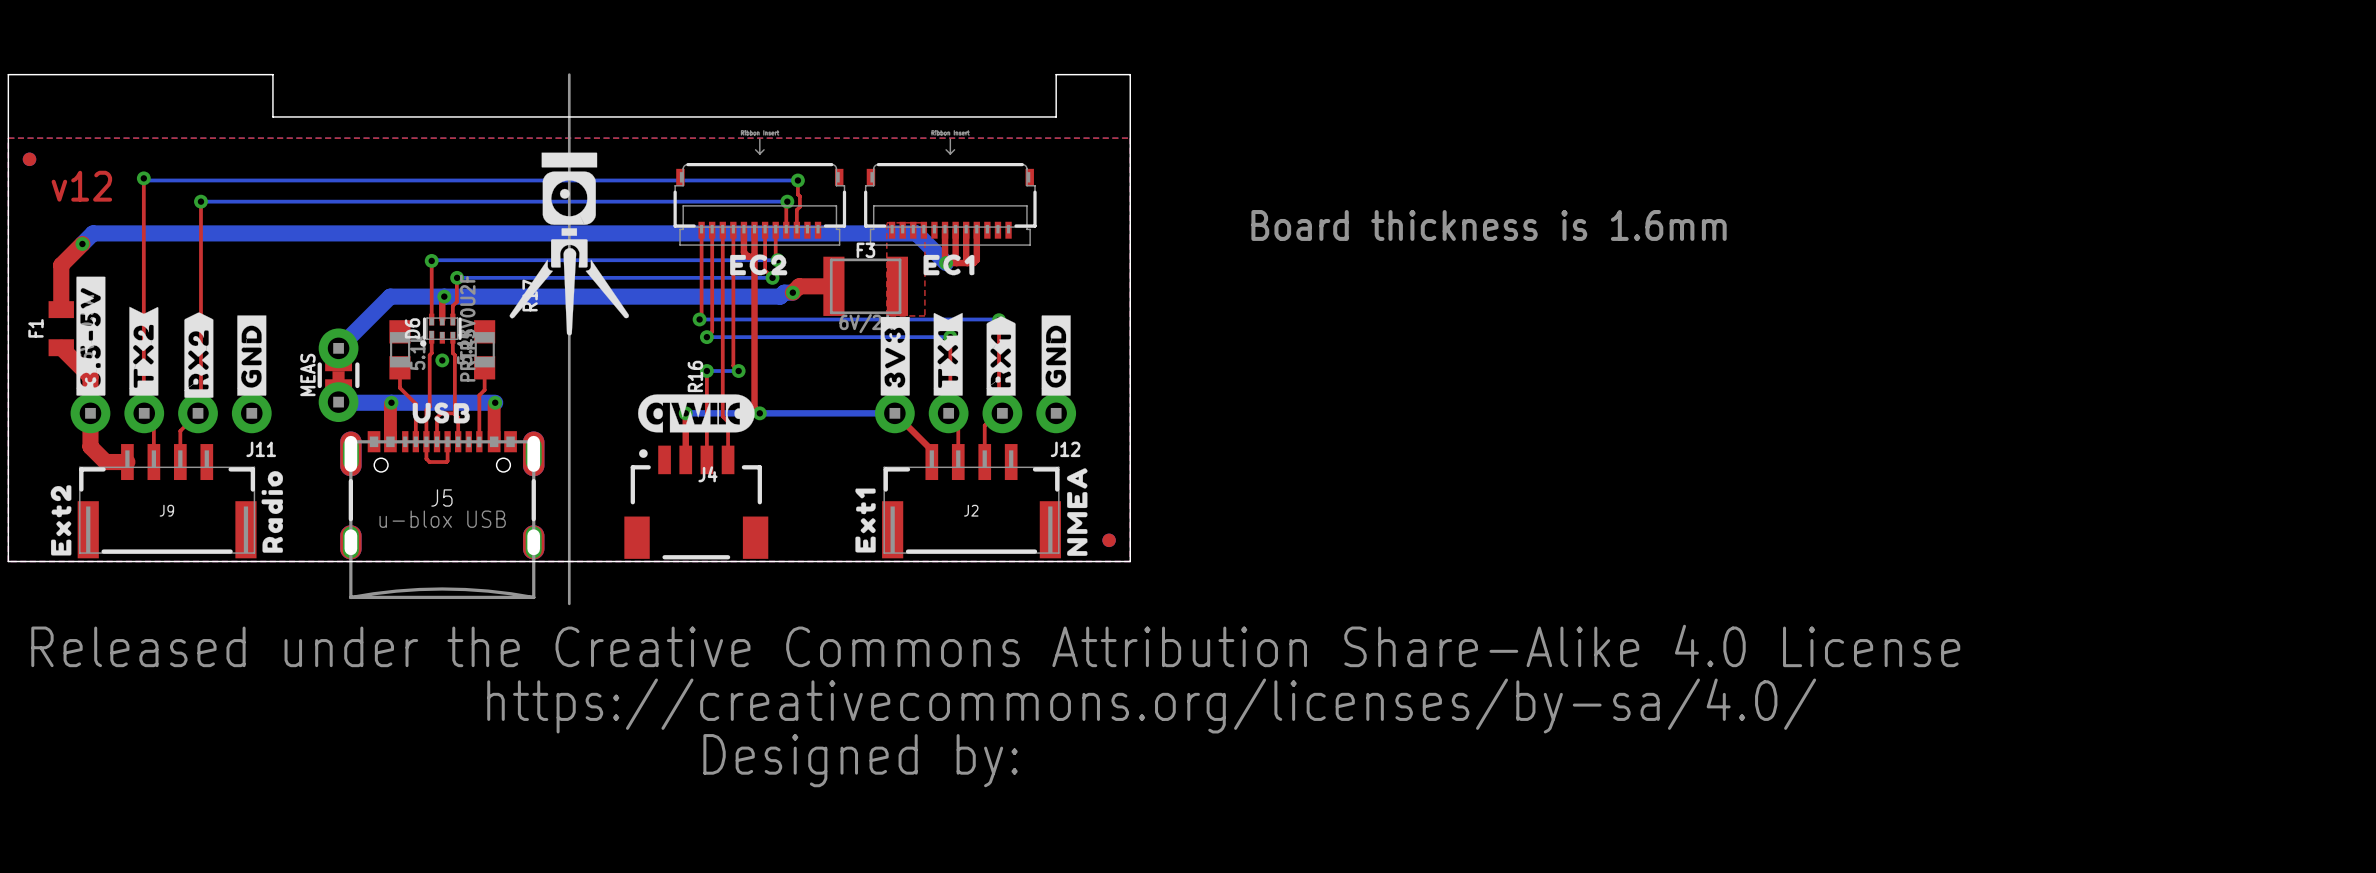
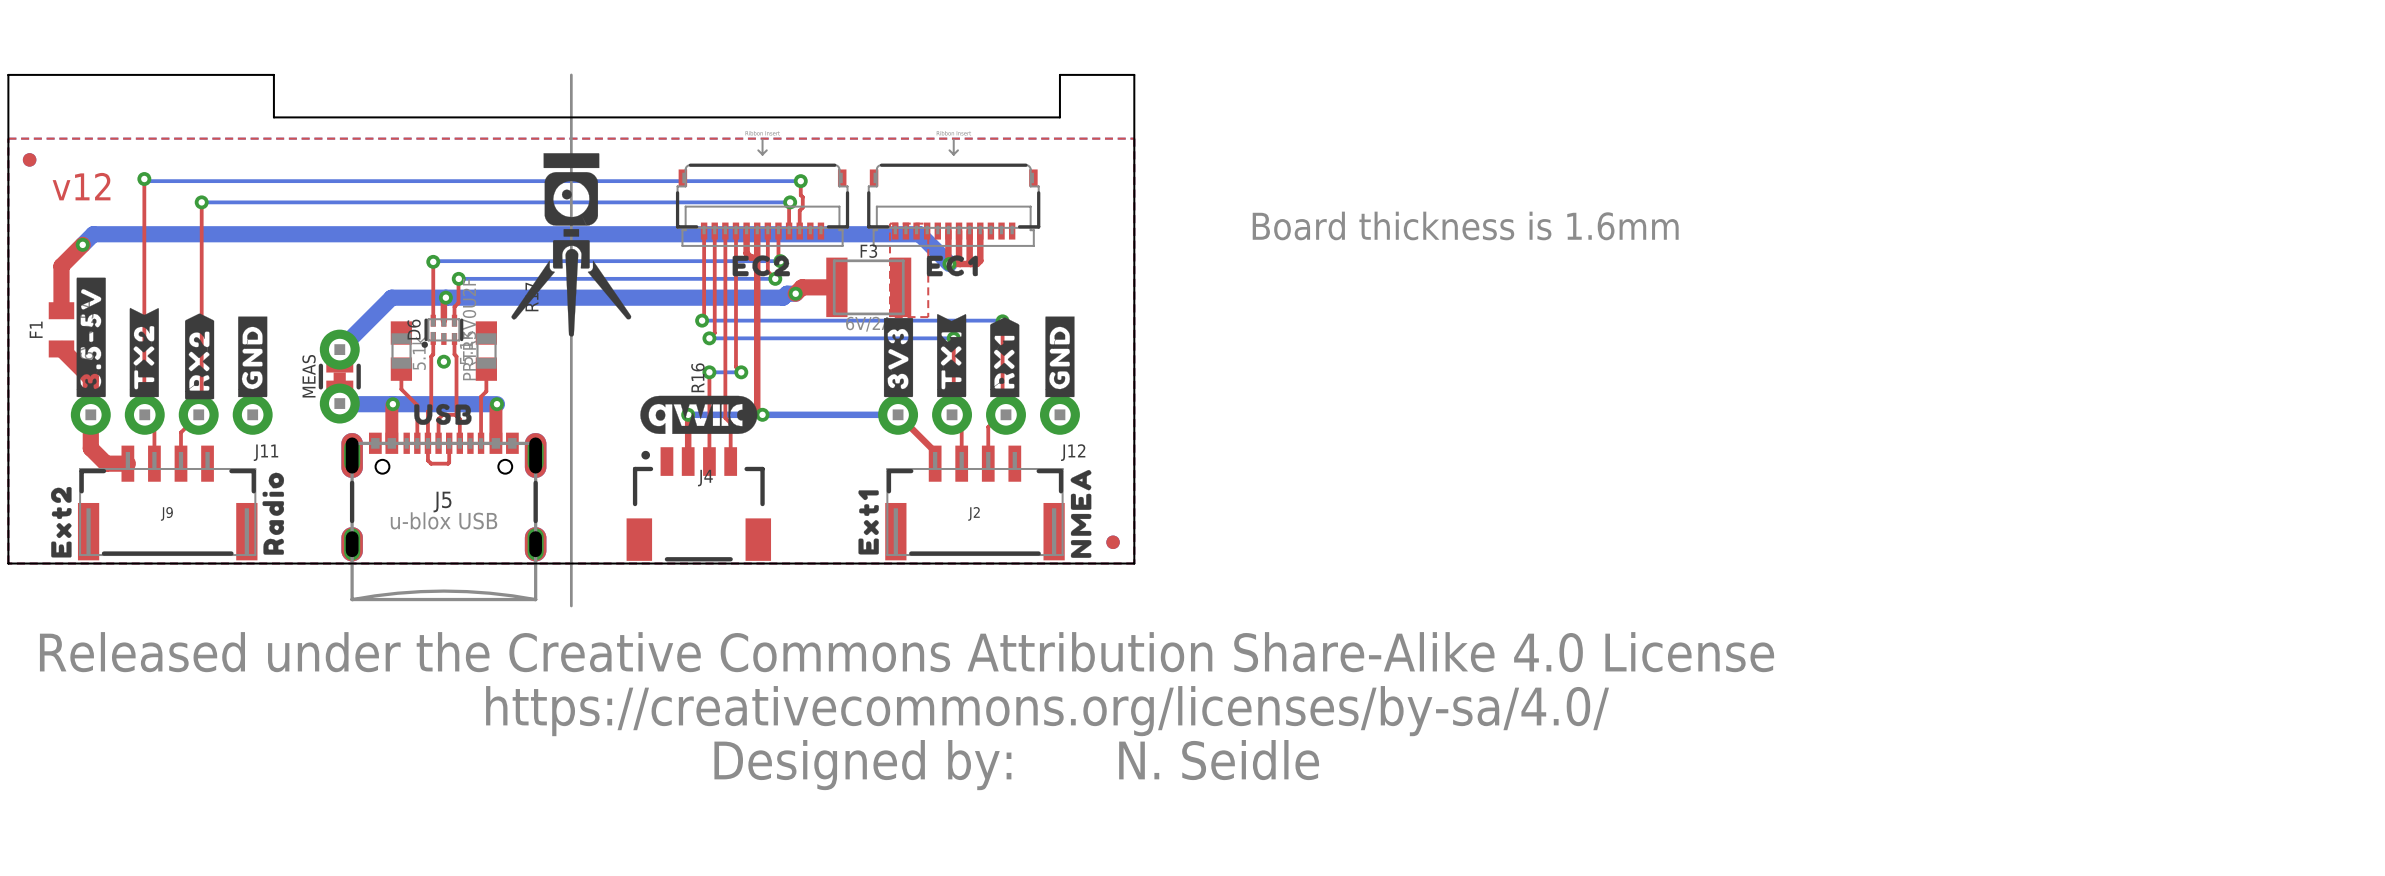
drawing position: (995, 705) -> (907, 711)
text: none -> N. Seidle (1219, 760)

